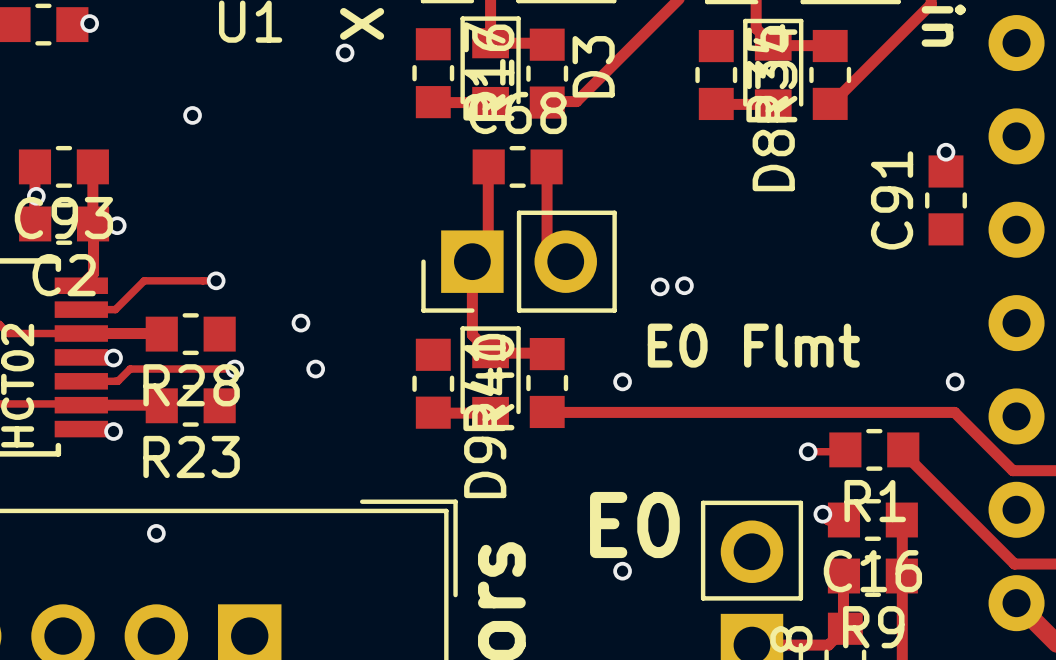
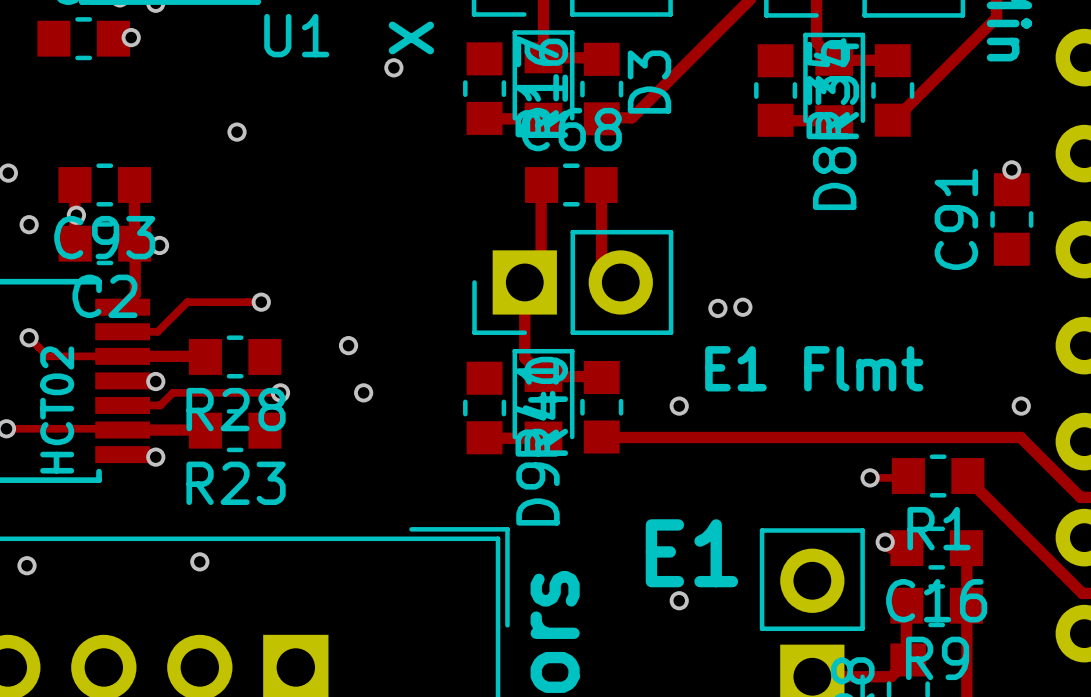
text: E0 Flmt (753, 345) -> E1 Flmt (814, 368)
text: E0 (634, 525) -> E1 (691, 553)

